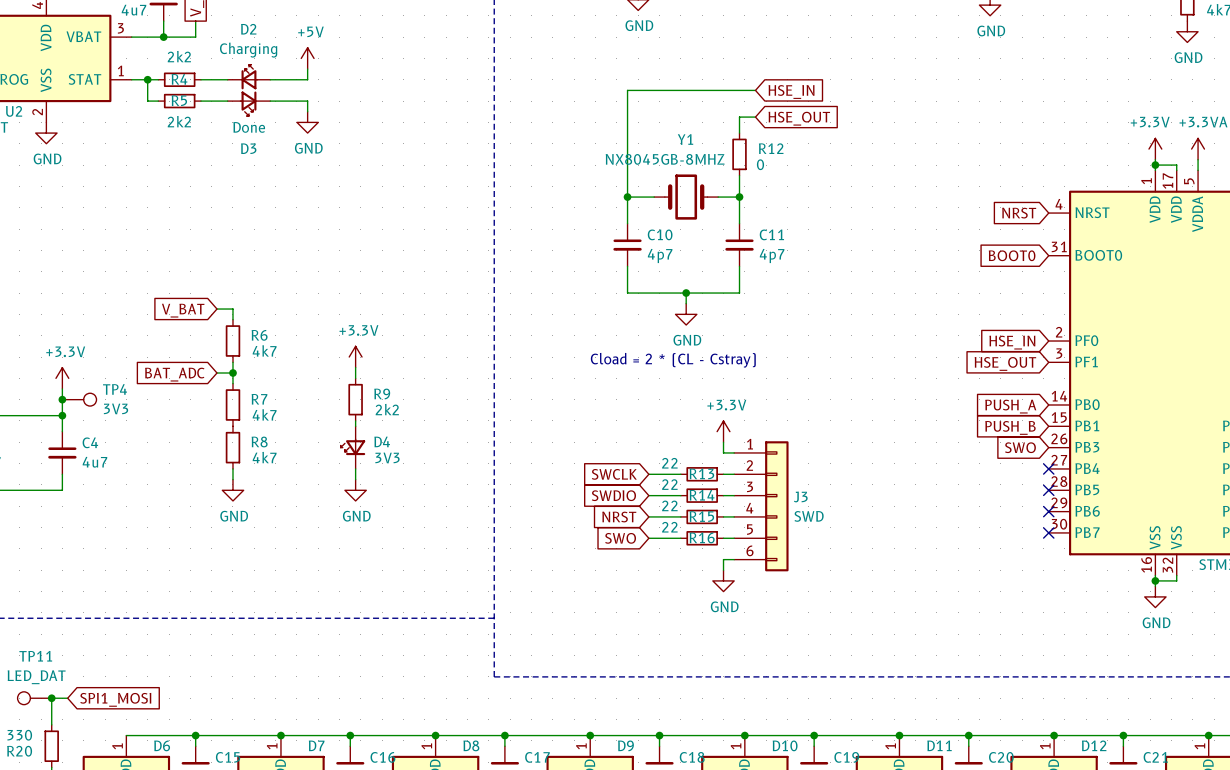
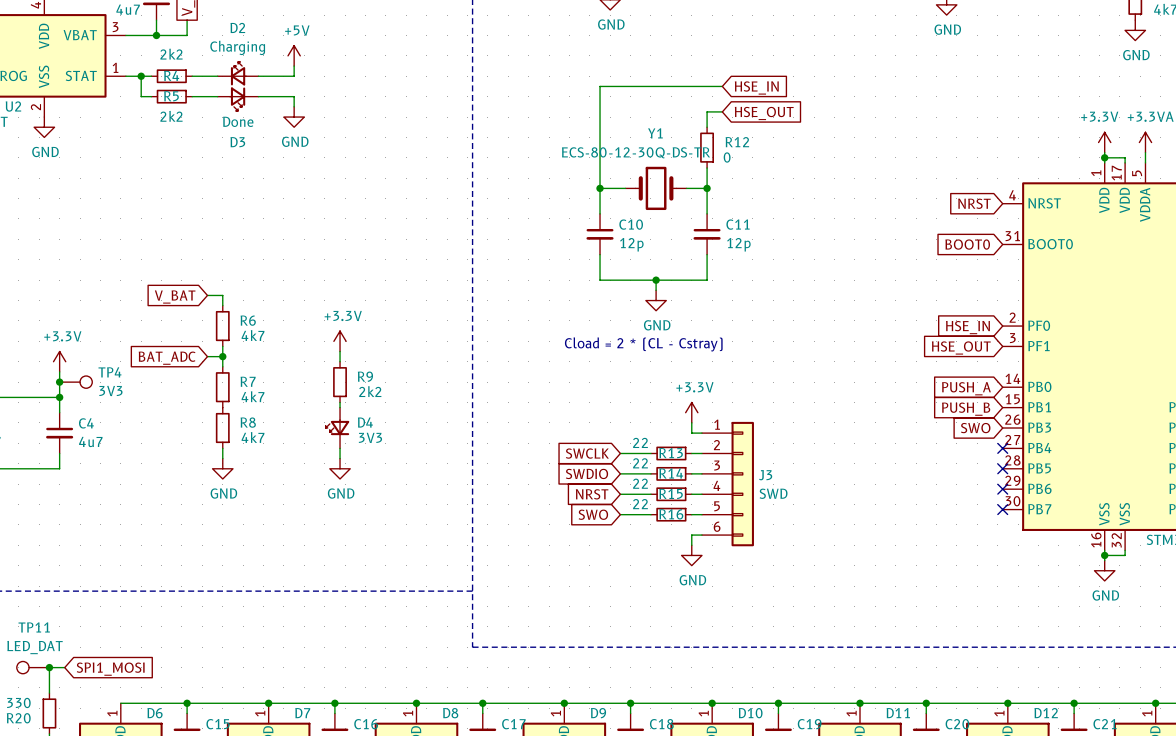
Y1 value: NX8045GB-8MHZ (665, 159) -> ECS-80-12-30Q-DS-TR (636, 152)
C10 value: 4p7 (660, 255) -> 12p (631, 244)
C11 value: 4p7 (772, 255) -> 12p (738, 244)

